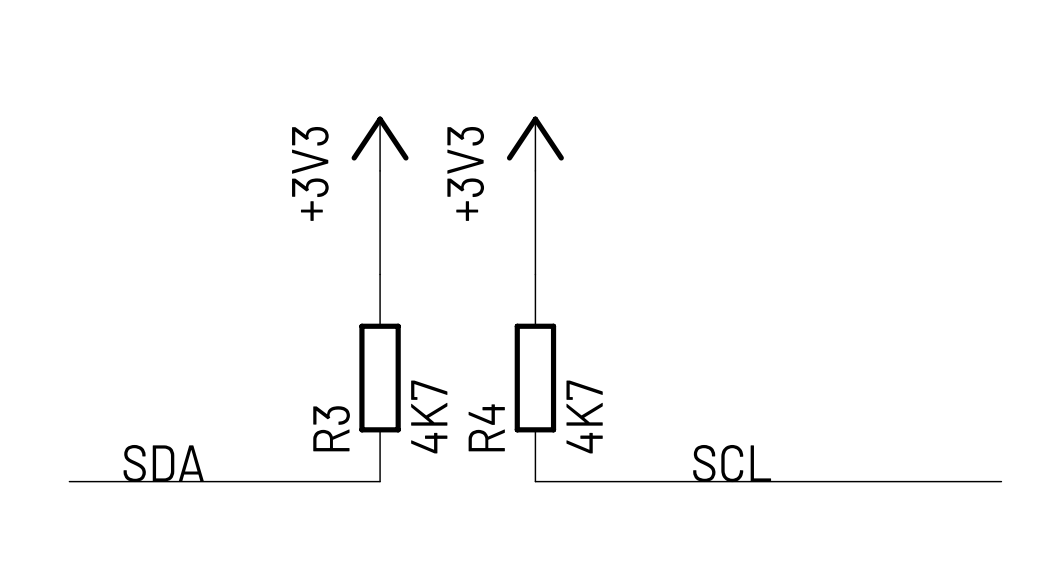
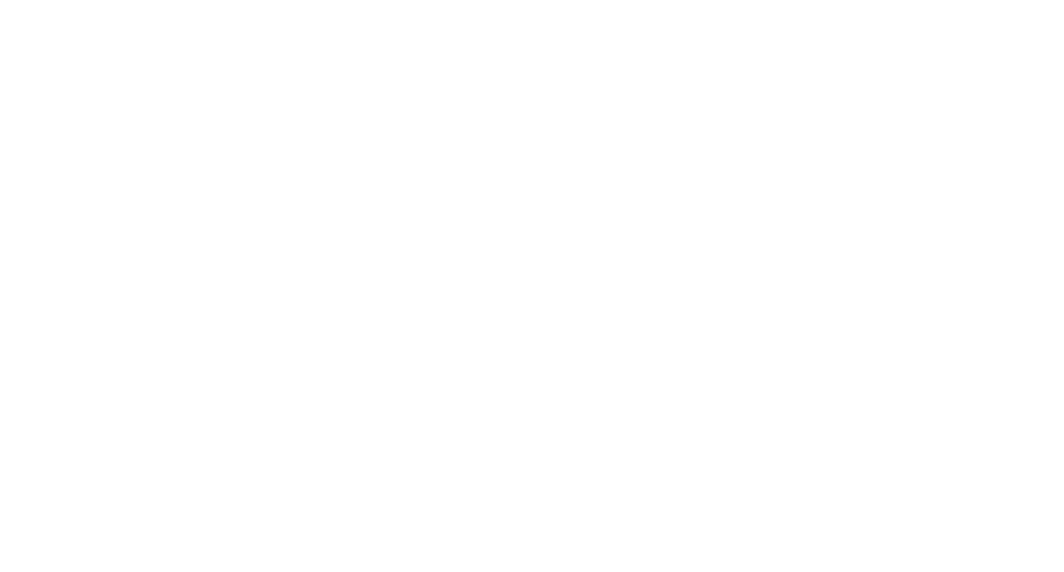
power symbol: +3V3 (380, 143) -> none
power symbol: +3V3 (535, 143) -> none
wire: (380, 170) (380, 274) -> none
wire: (535, 170) (535, 274) -> none
R3: 4K7 (380, 378) -> none
R4: 4K7 (535, 378) -> none
label: SDA (163, 463) -> none
label: SCL (732, 463) -> none
wire: (69, 481) (380, 481) -> none
wire: (535, 481) (1001, 481) -> none

